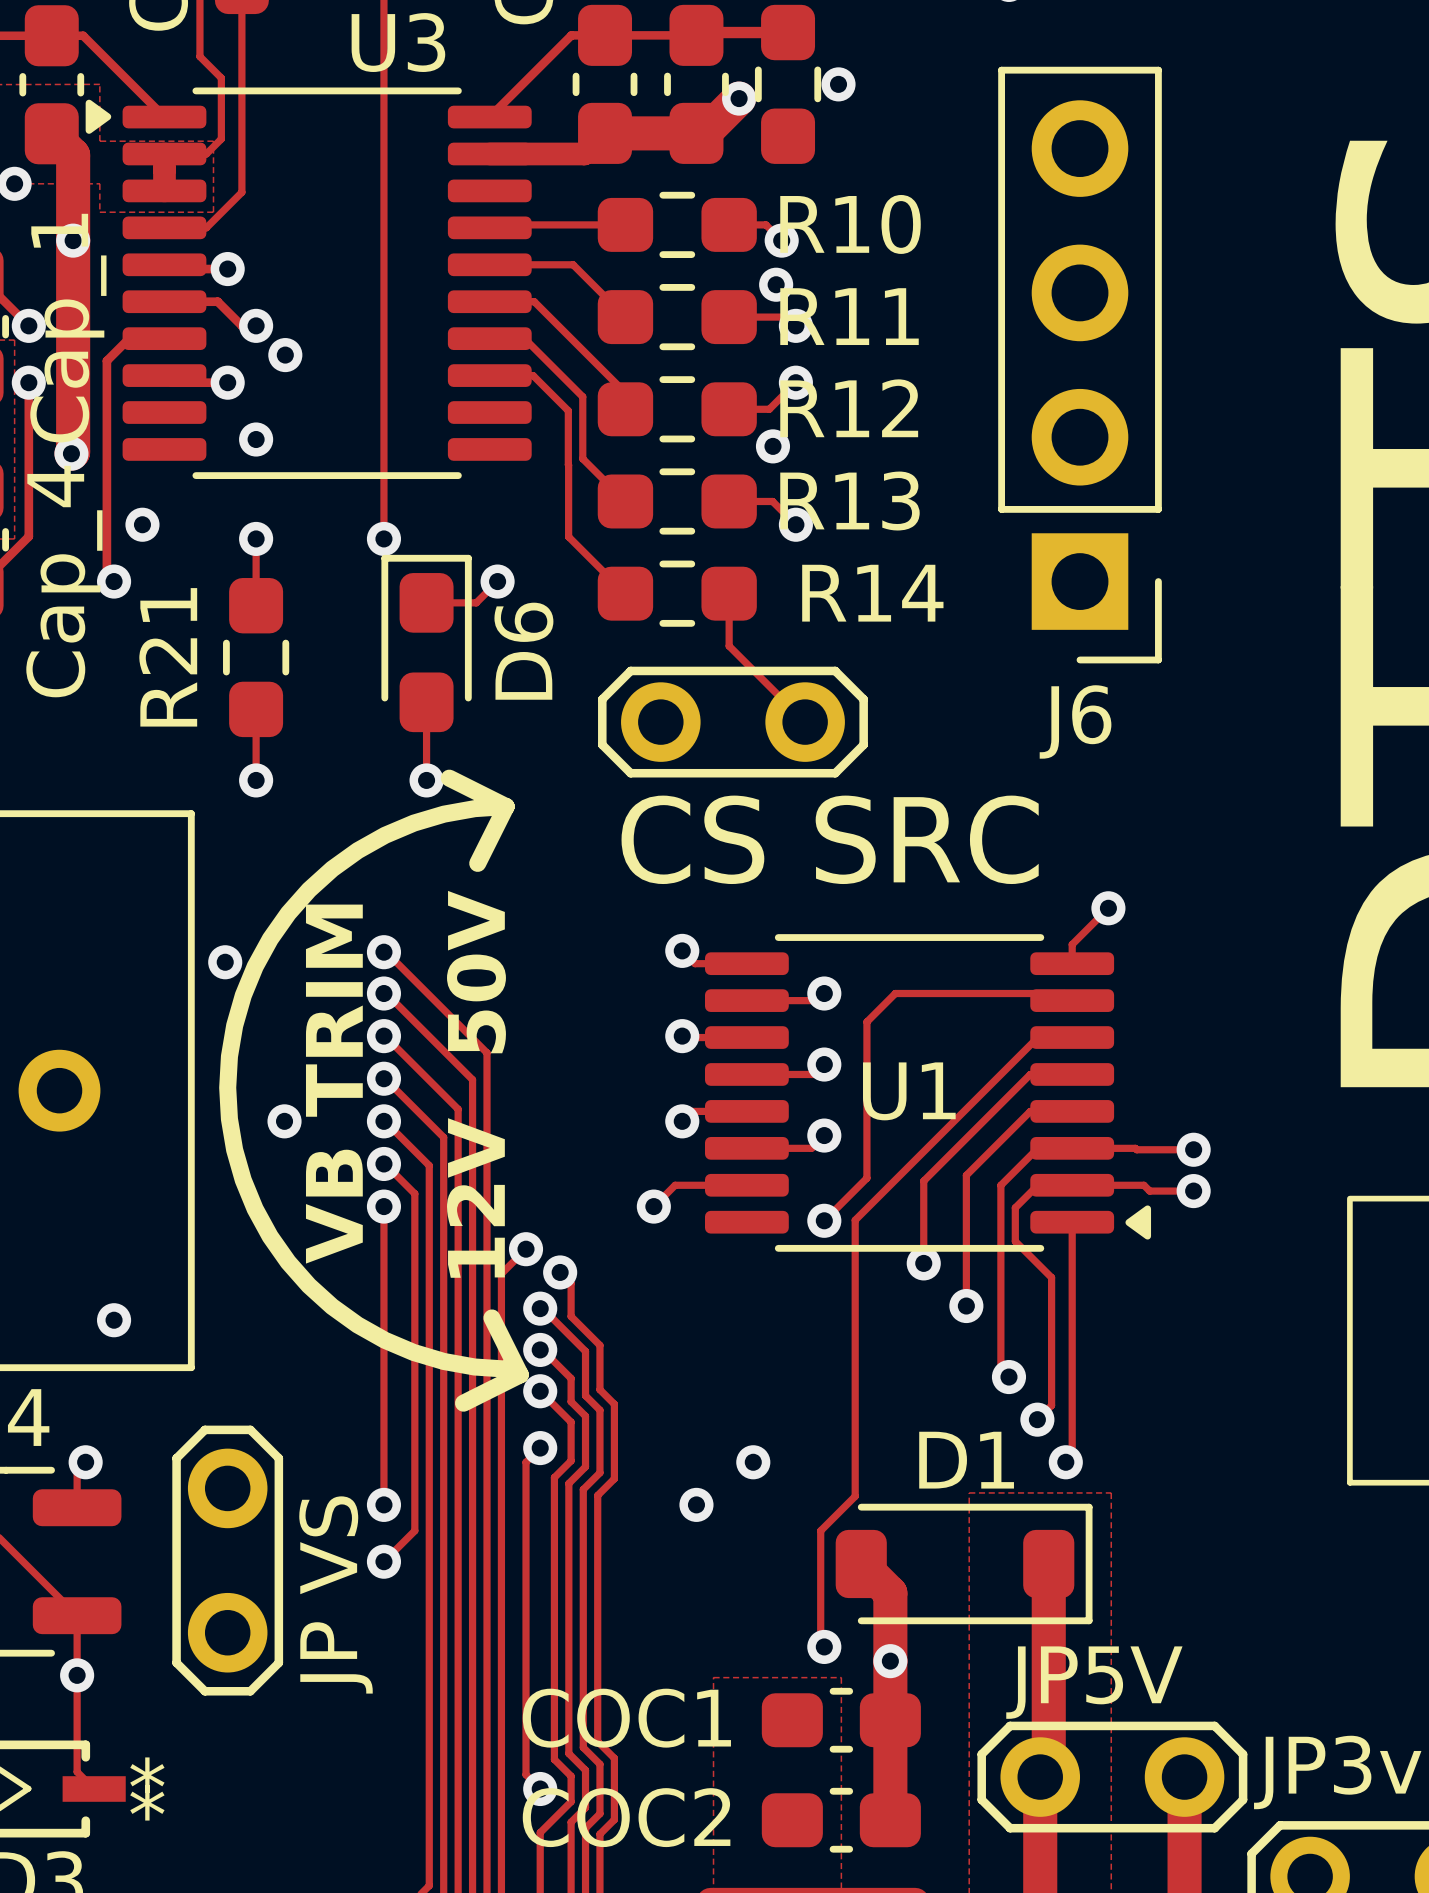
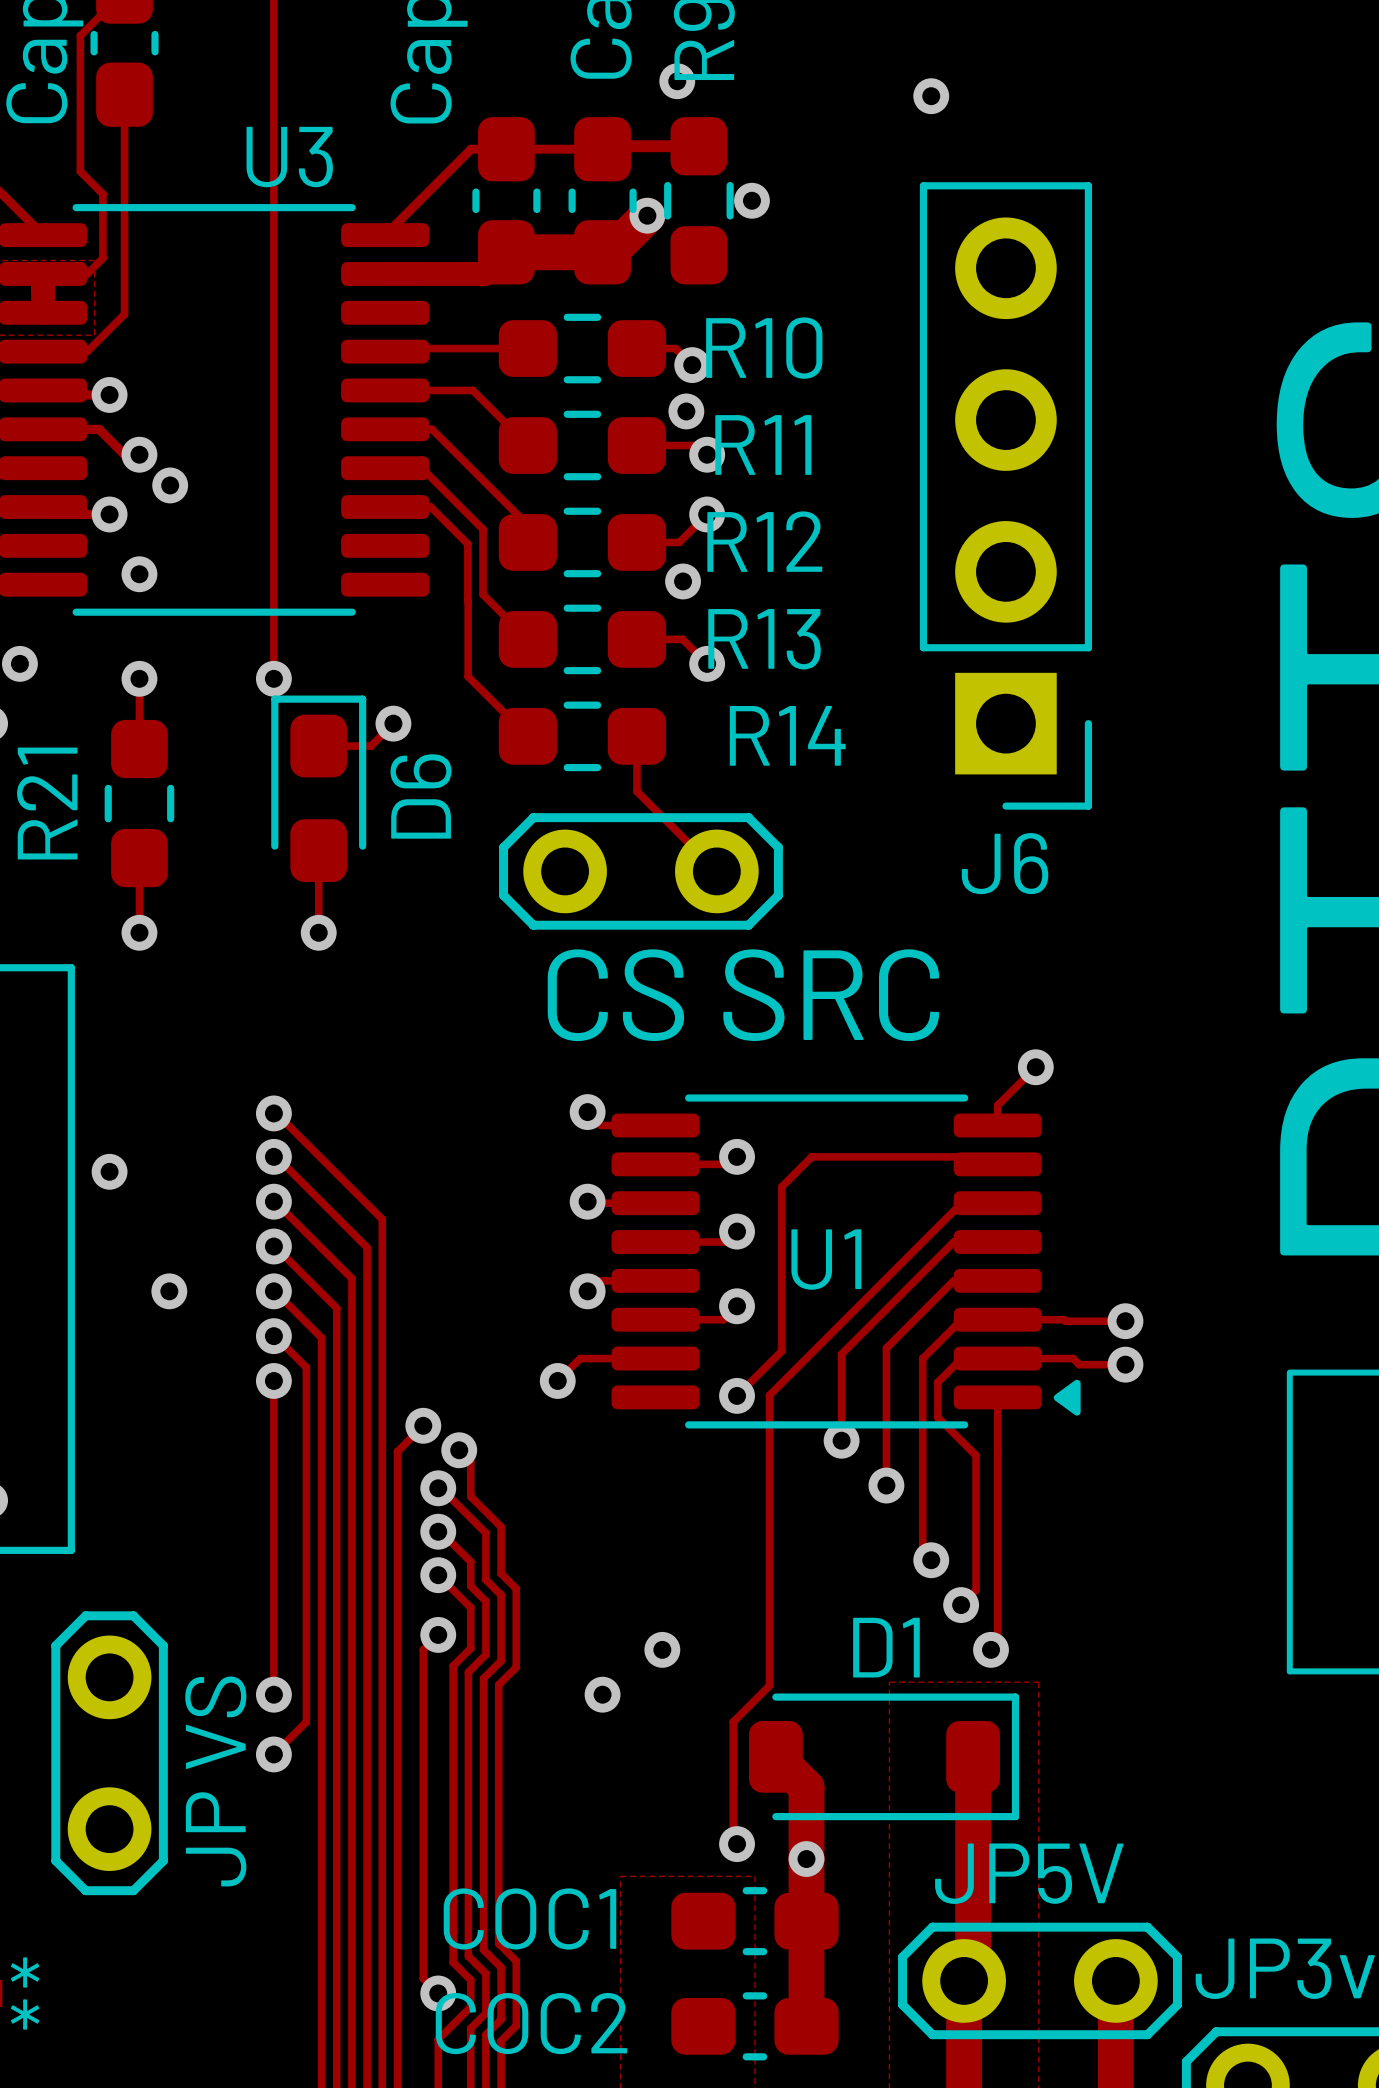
line: (449, 778) (506, 806) -> none
line: (506, 806) (477, 863) -> none
line: (506, 806) (474, 808) (444, 814) (414, 823) (385, 835) (357, 850) (332, 868) (309, 889) (288, 913) (270, 938) (255, 966) (243, 995) (234, 1025) (229, 1056) (227, 1087) (229, 1118) (234, 1149) (243, 1180) (255, 1208) (270, 1236) (288, 1262) (308, 1285) (332, 1306) (357, 1324) (384, 1340) (413, 1352) (443, 1361) (474, 1367) (505, 1369) -> none
via position: (225, 962) -> (109, 1171)
text: 50V (476, 972) -> none
text: VB TRIM (334, 1084) -> none
text: 12V (475, 1197) -> none
line: (491, 1317) (520, 1374) (463, 1403) -> none

